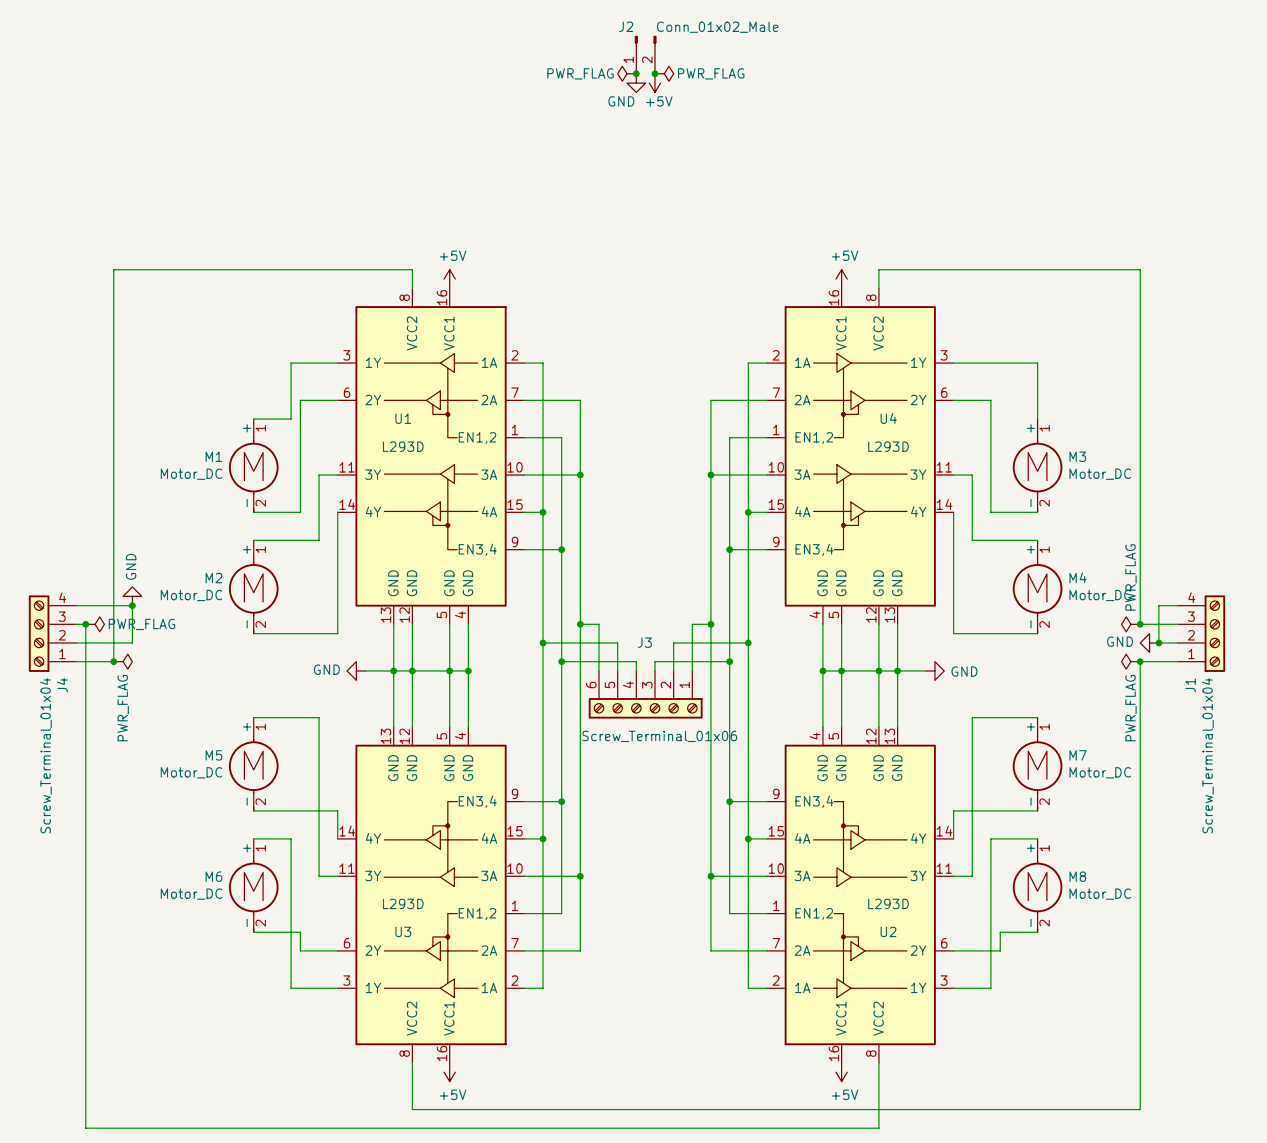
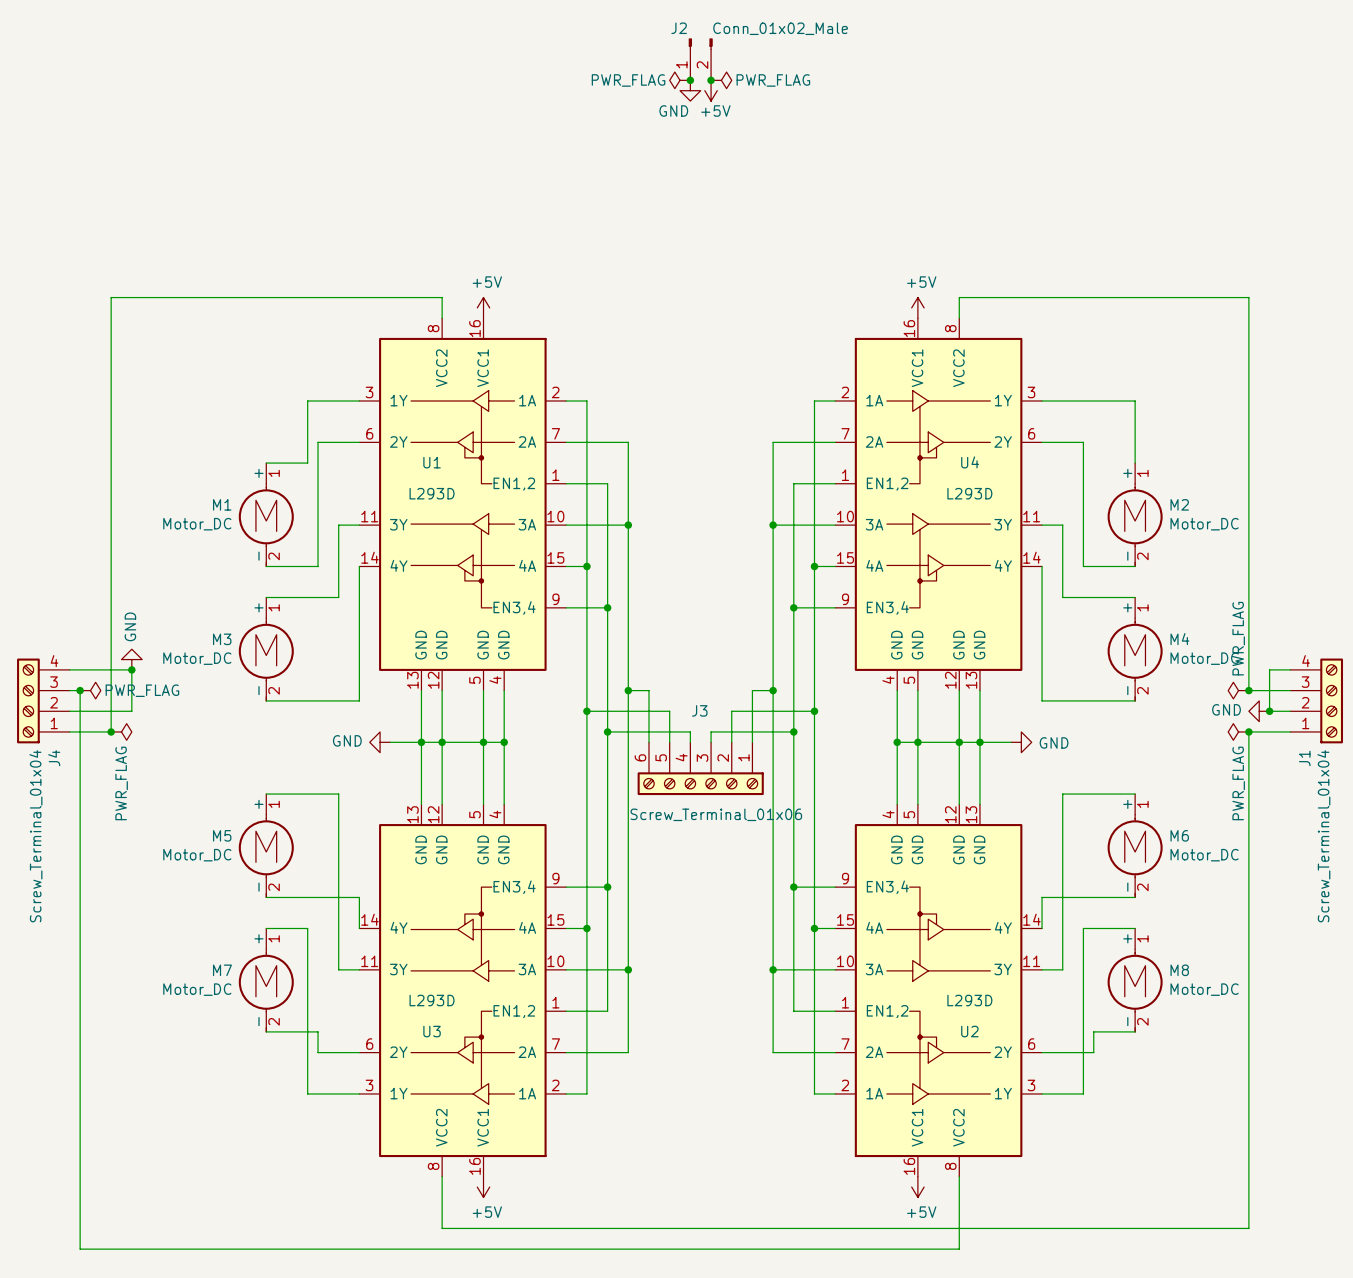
M3 name: M3 (1077, 456) -> M2 (1179, 504)
M2 name: M2 (213, 578) -> M3 (222, 639)
M7 name: M7 (1078, 755) -> M6 (1179, 835)
M6 name: M6 (213, 876) -> M7 (222, 970)

